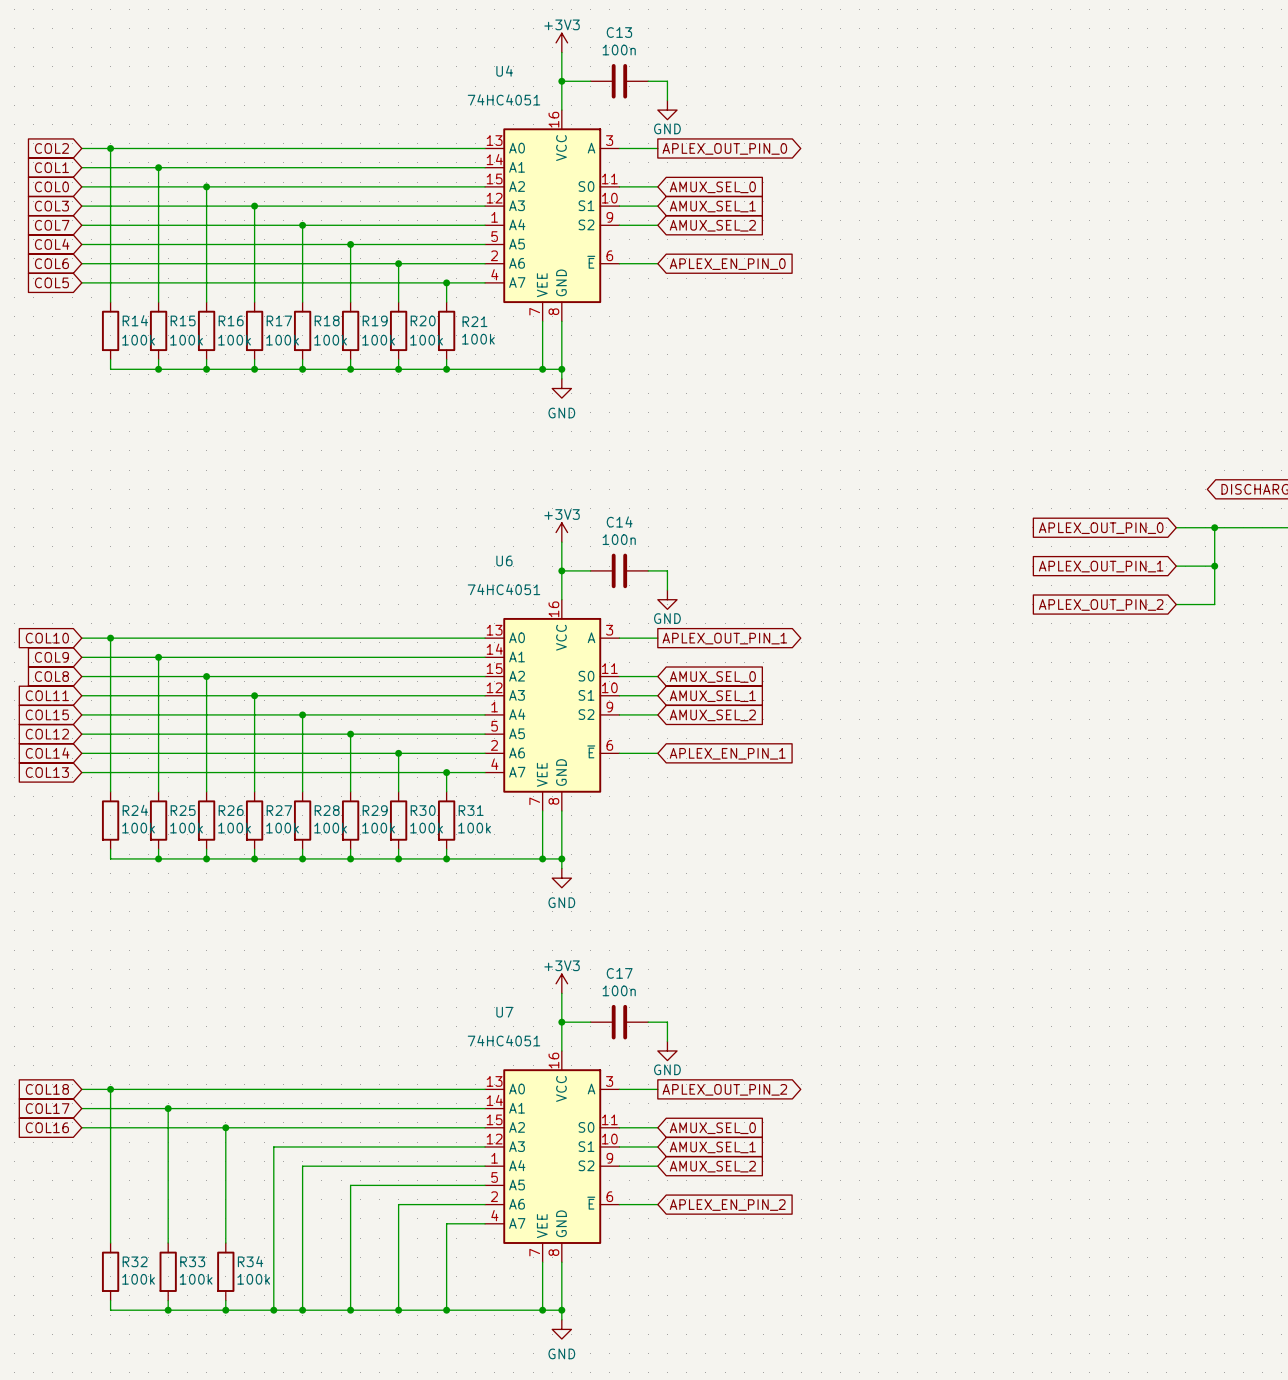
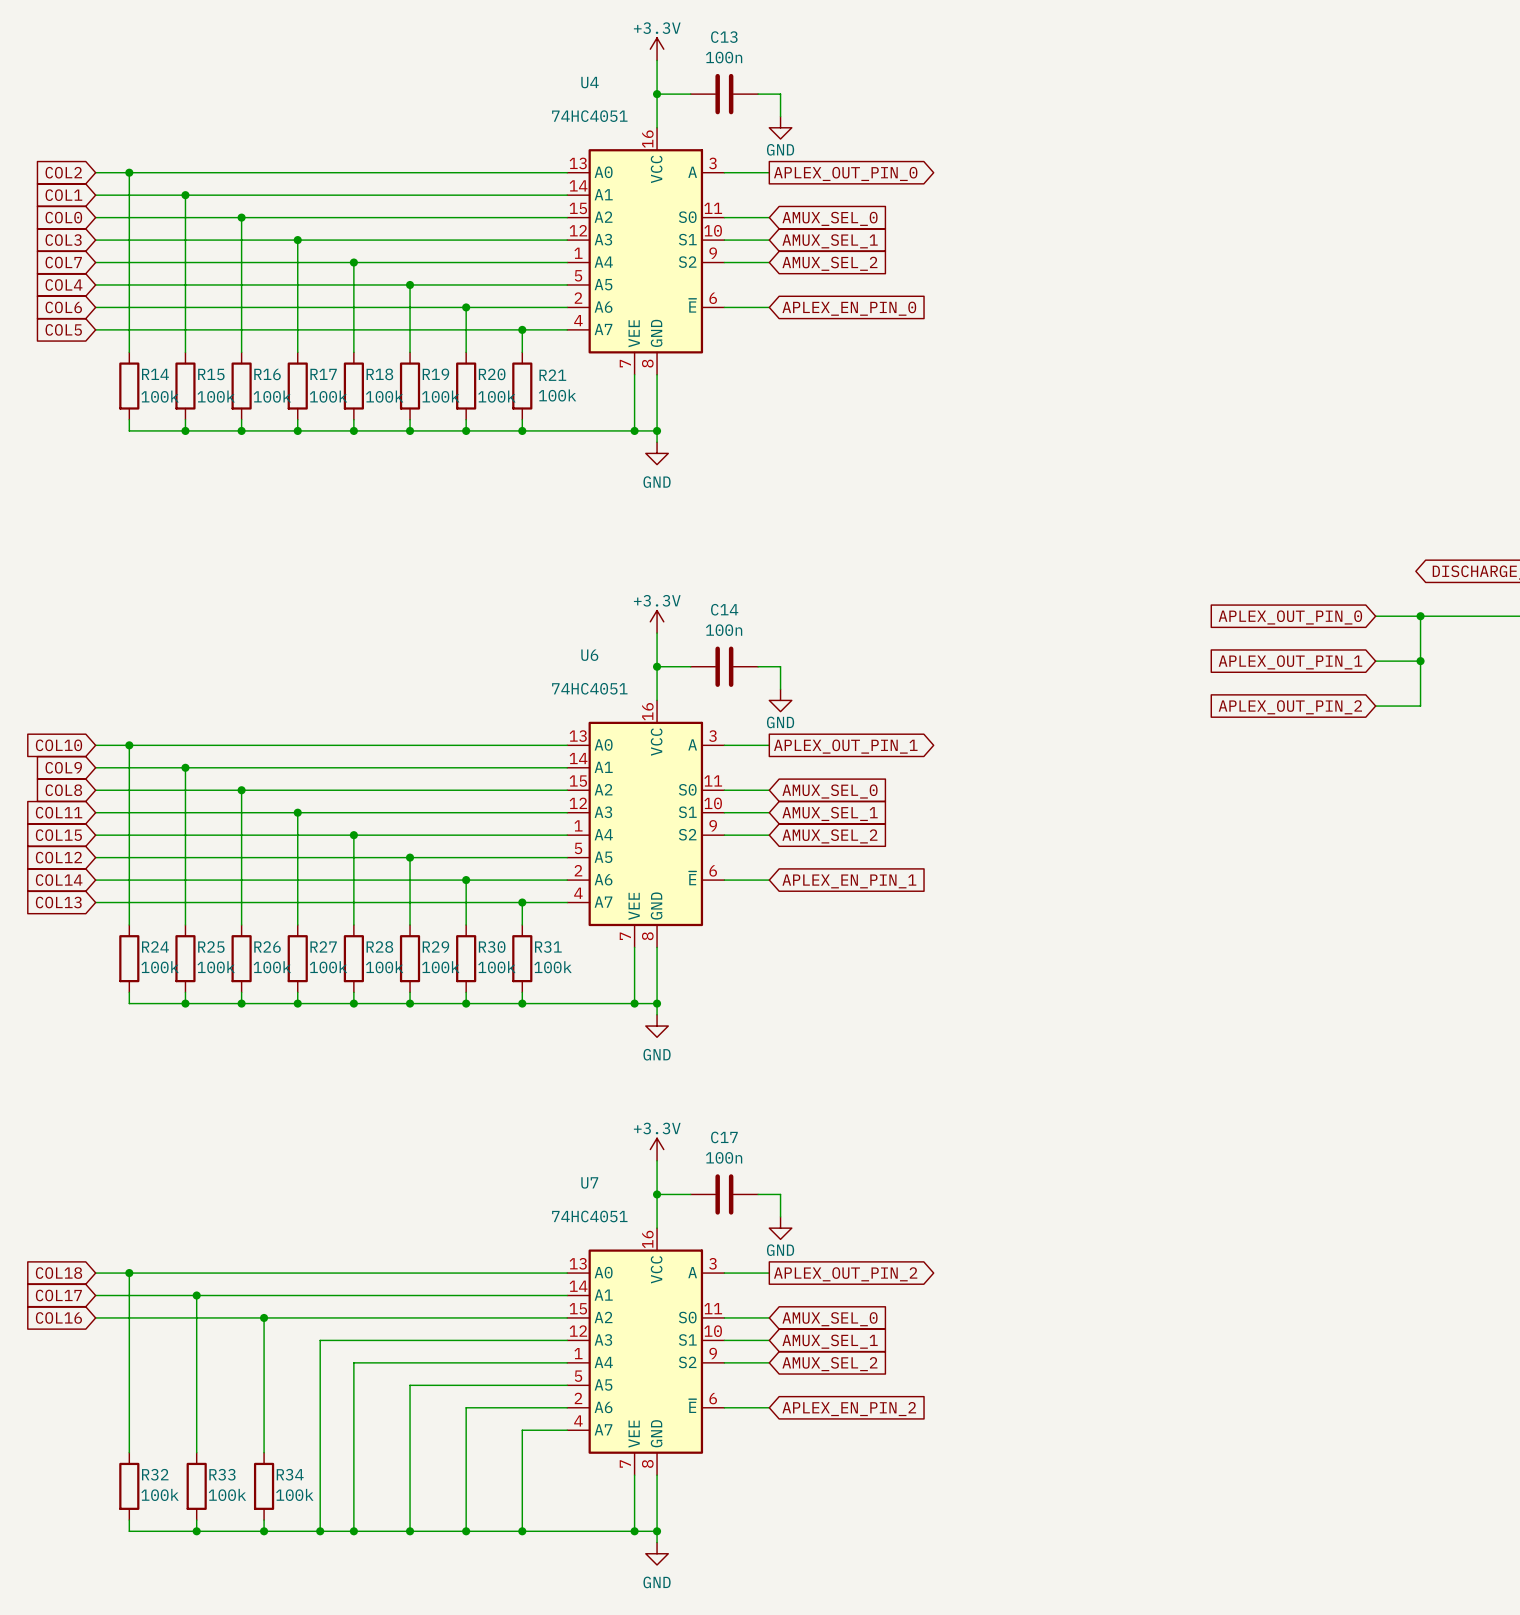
power symbol: +3V3 (561, 42) -> +3.3V (657, 49)
power symbol: +3V3 (561, 532) -> +3.3V (657, 621)
power symbol: +3V3 (561, 983) -> +3.3V (657, 1149)

